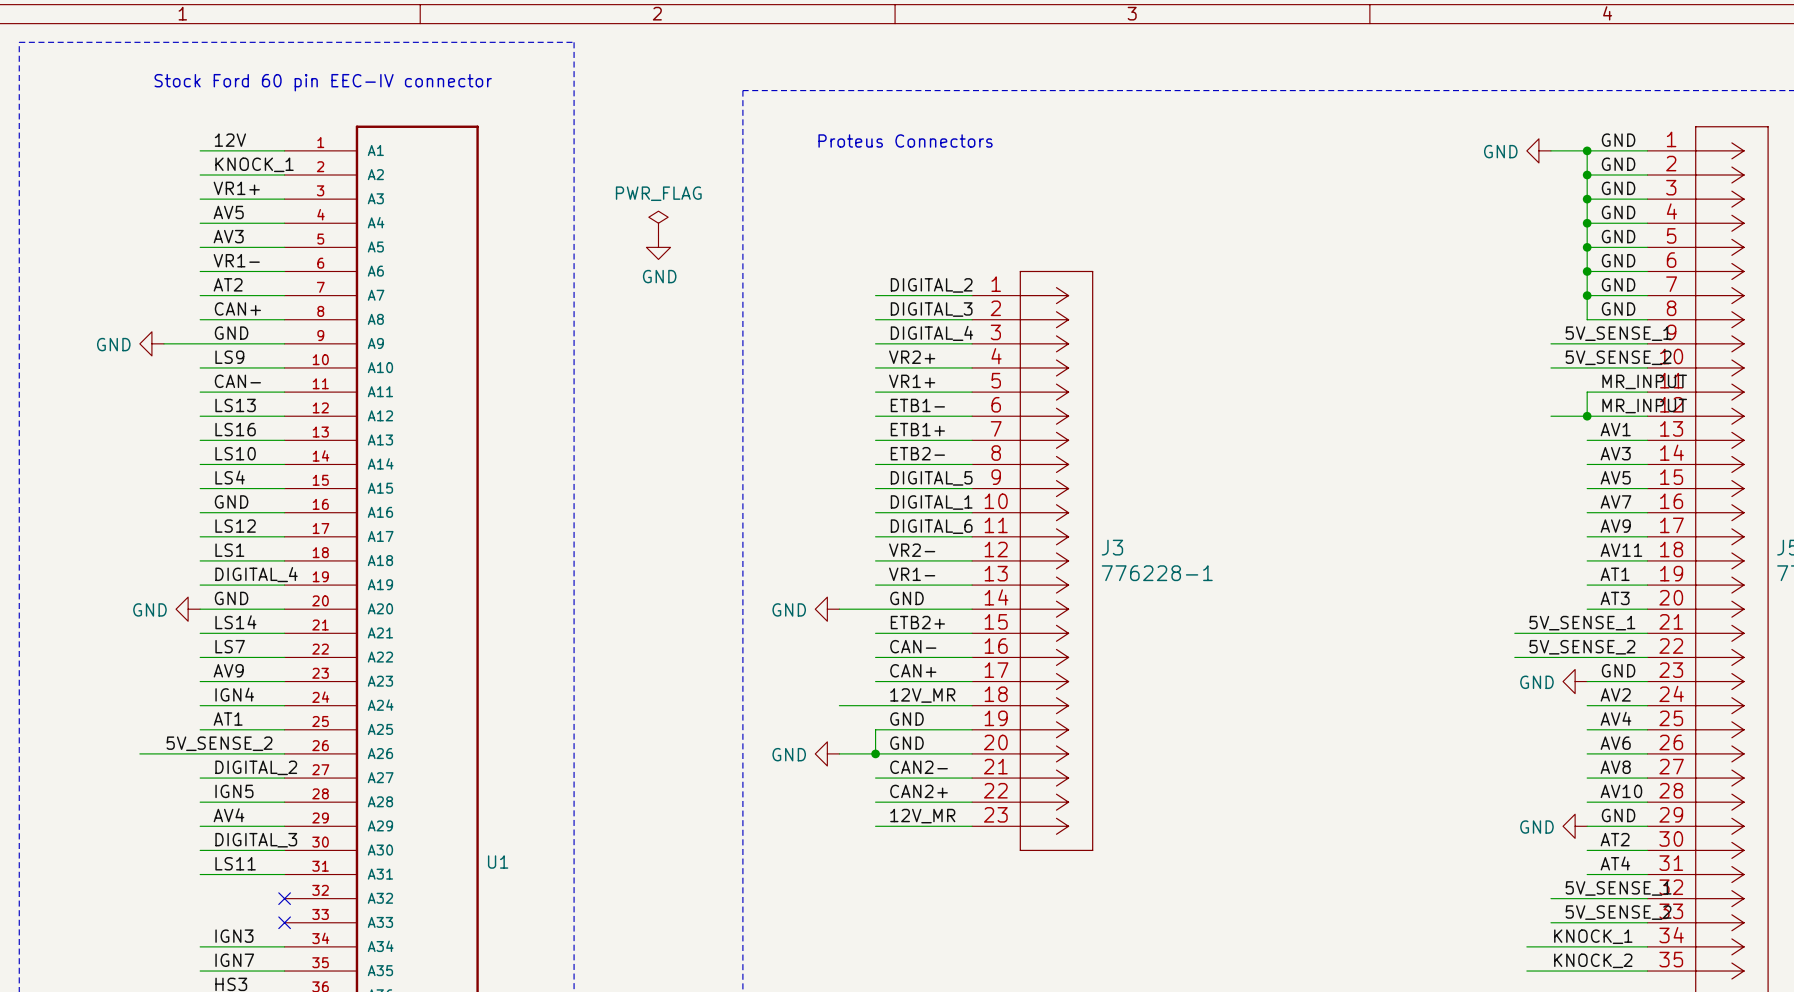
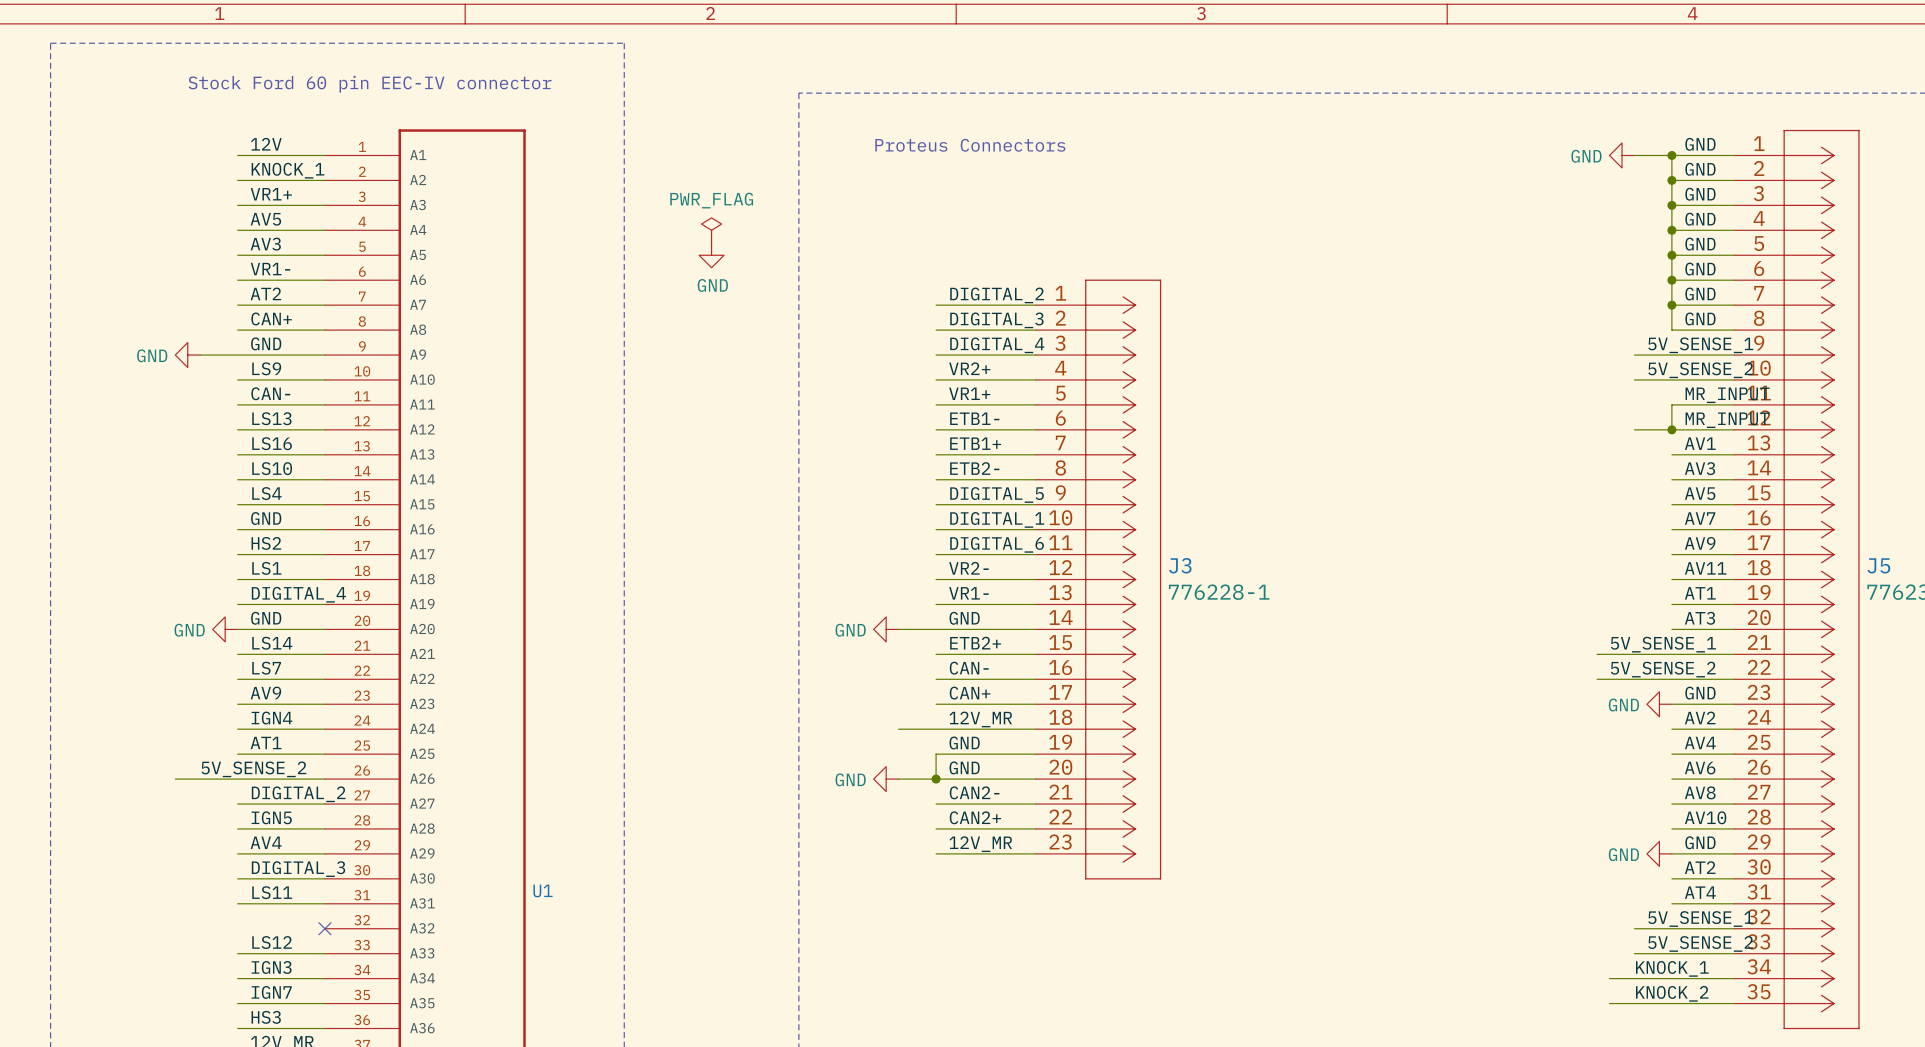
label: LS12 (235, 526) -> HS2 (266, 543)
label: none -> LS12 (272, 942)
wire: none -> (237, 953) (324, 953)
no-connect mark: (284, 922) -> none

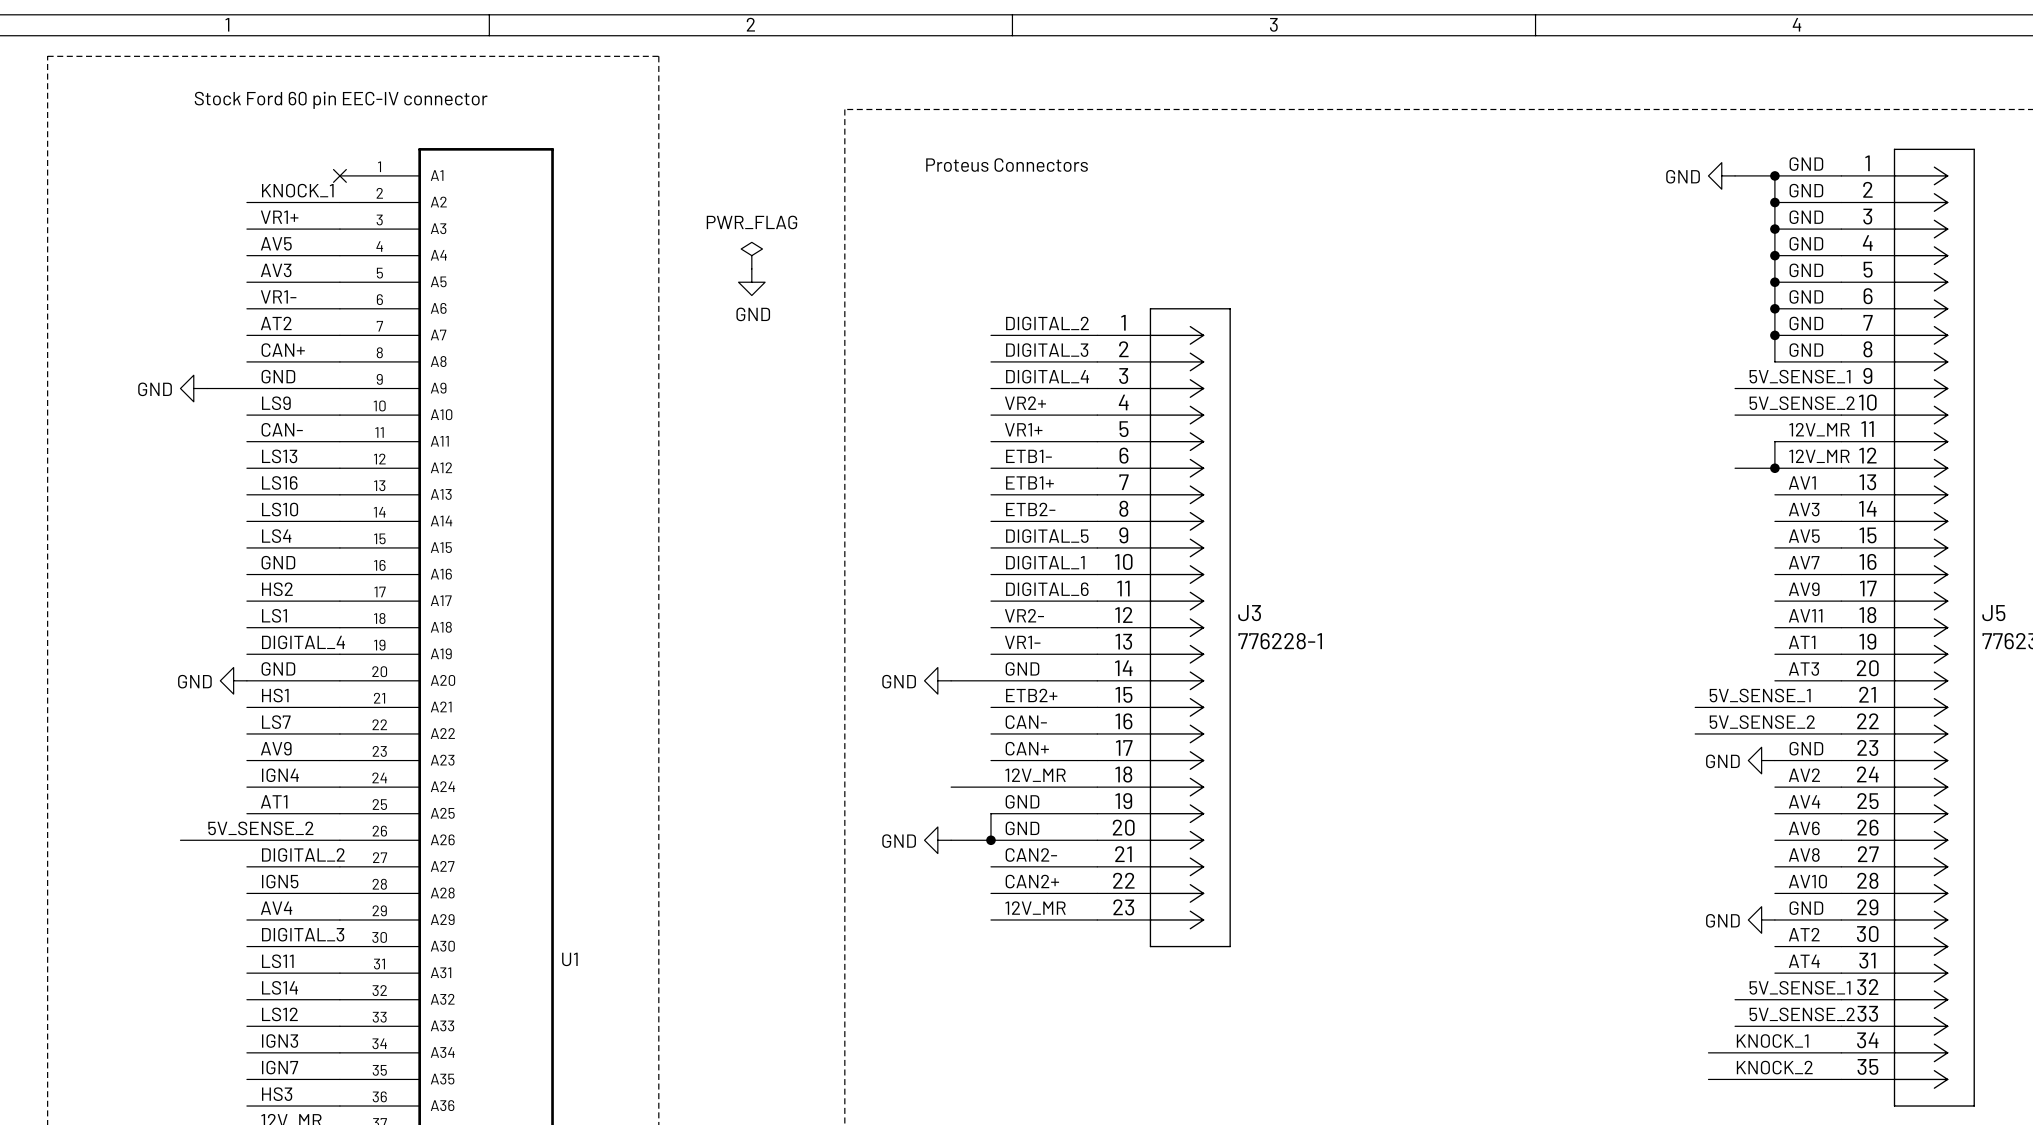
label: 12V (266, 144) -> none
wire: (237, 155) (324, 155) -> none
no-connect mark: none -> (339, 175)
label: MR_INPUT (1727, 395) -> 12V_MR (1819, 429)
label: MR_INPUT (1727, 420) -> 12V_MR (1819, 456)
label: LS14 (272, 643) -> HS1 (275, 695)
label: none -> LS14 (280, 987)
wire: none -> (246, 999) (339, 999)
no-connect mark: (324, 928) -> none

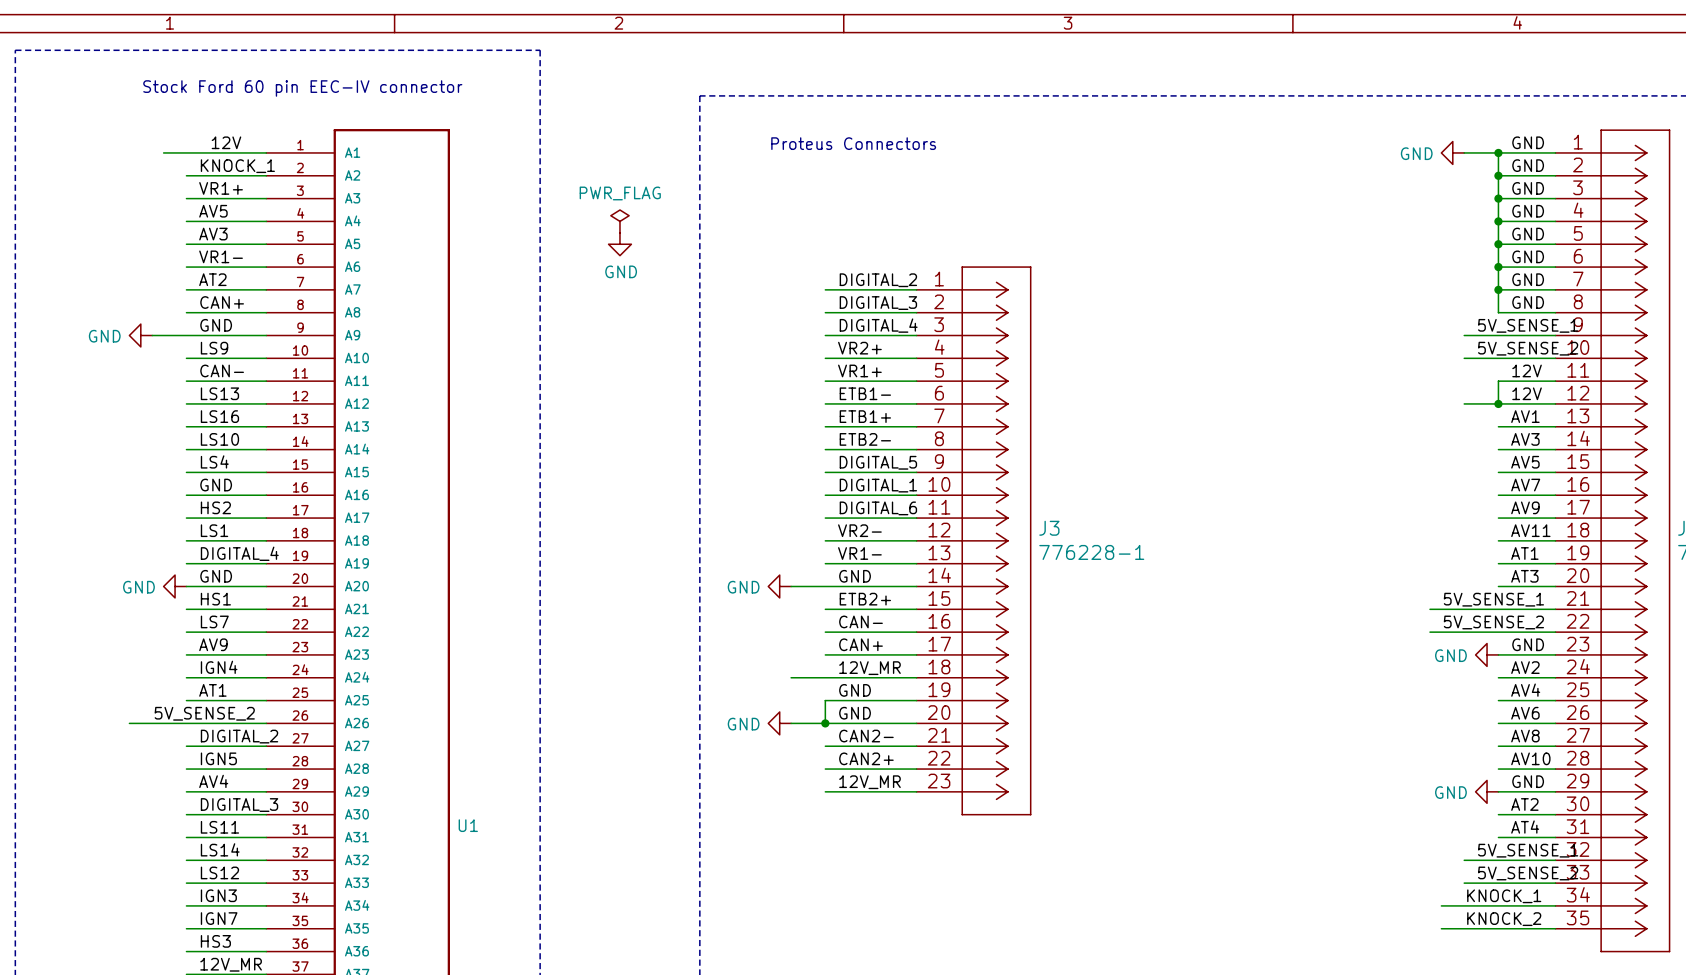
label: none -> 12V (226, 142)
wire: none -> (163, 152) (266, 152)
no-connect mark: (339, 175) -> none
label: 12V_MR (1819, 429) -> 12V (1527, 370)
label: 12V_MR (1819, 456) -> 12V (1527, 393)

